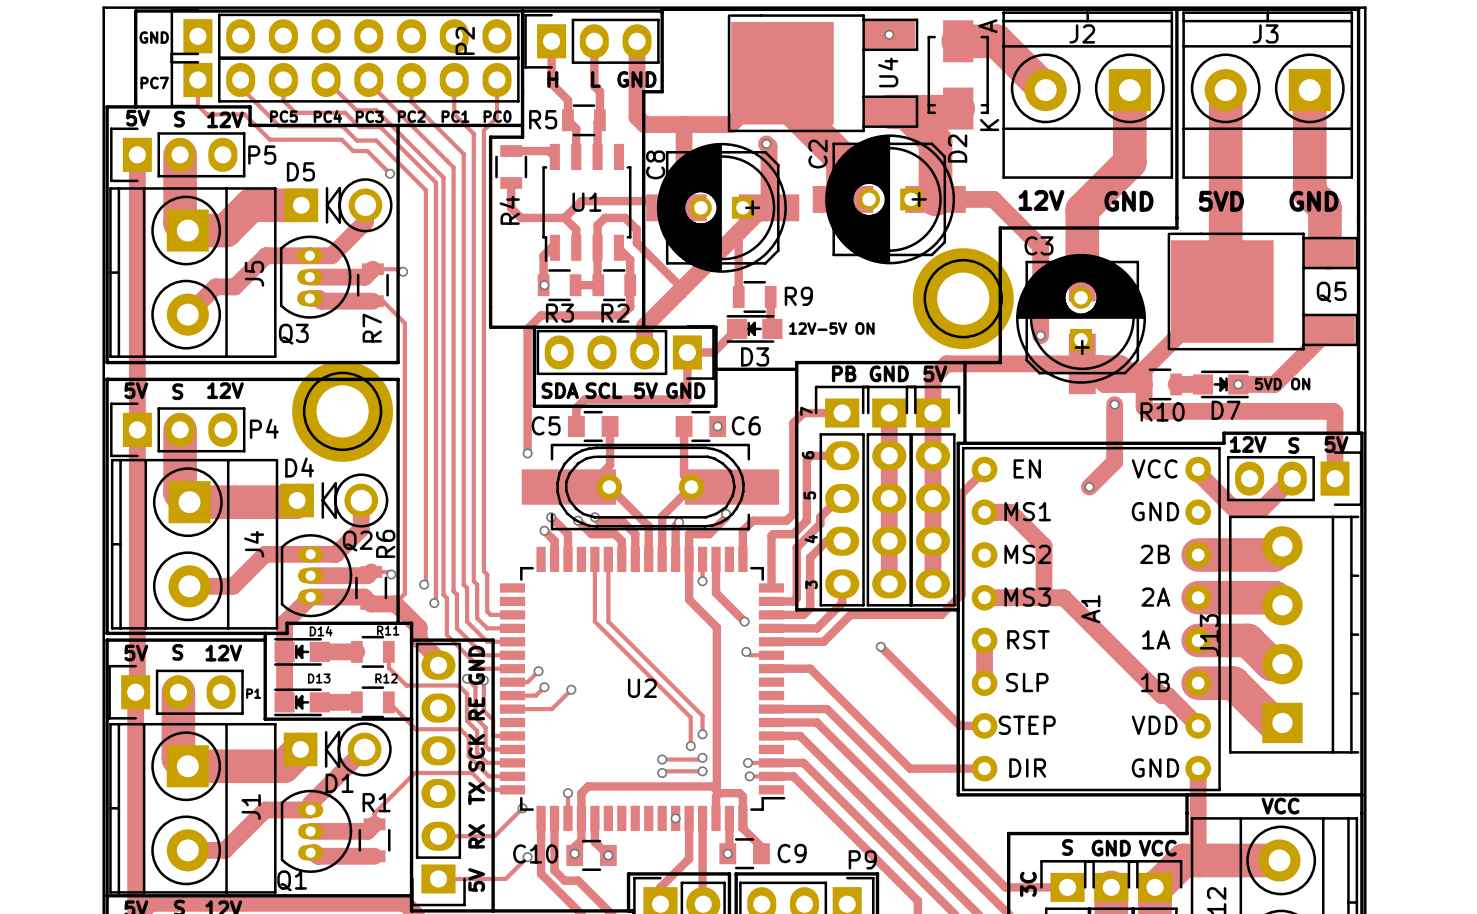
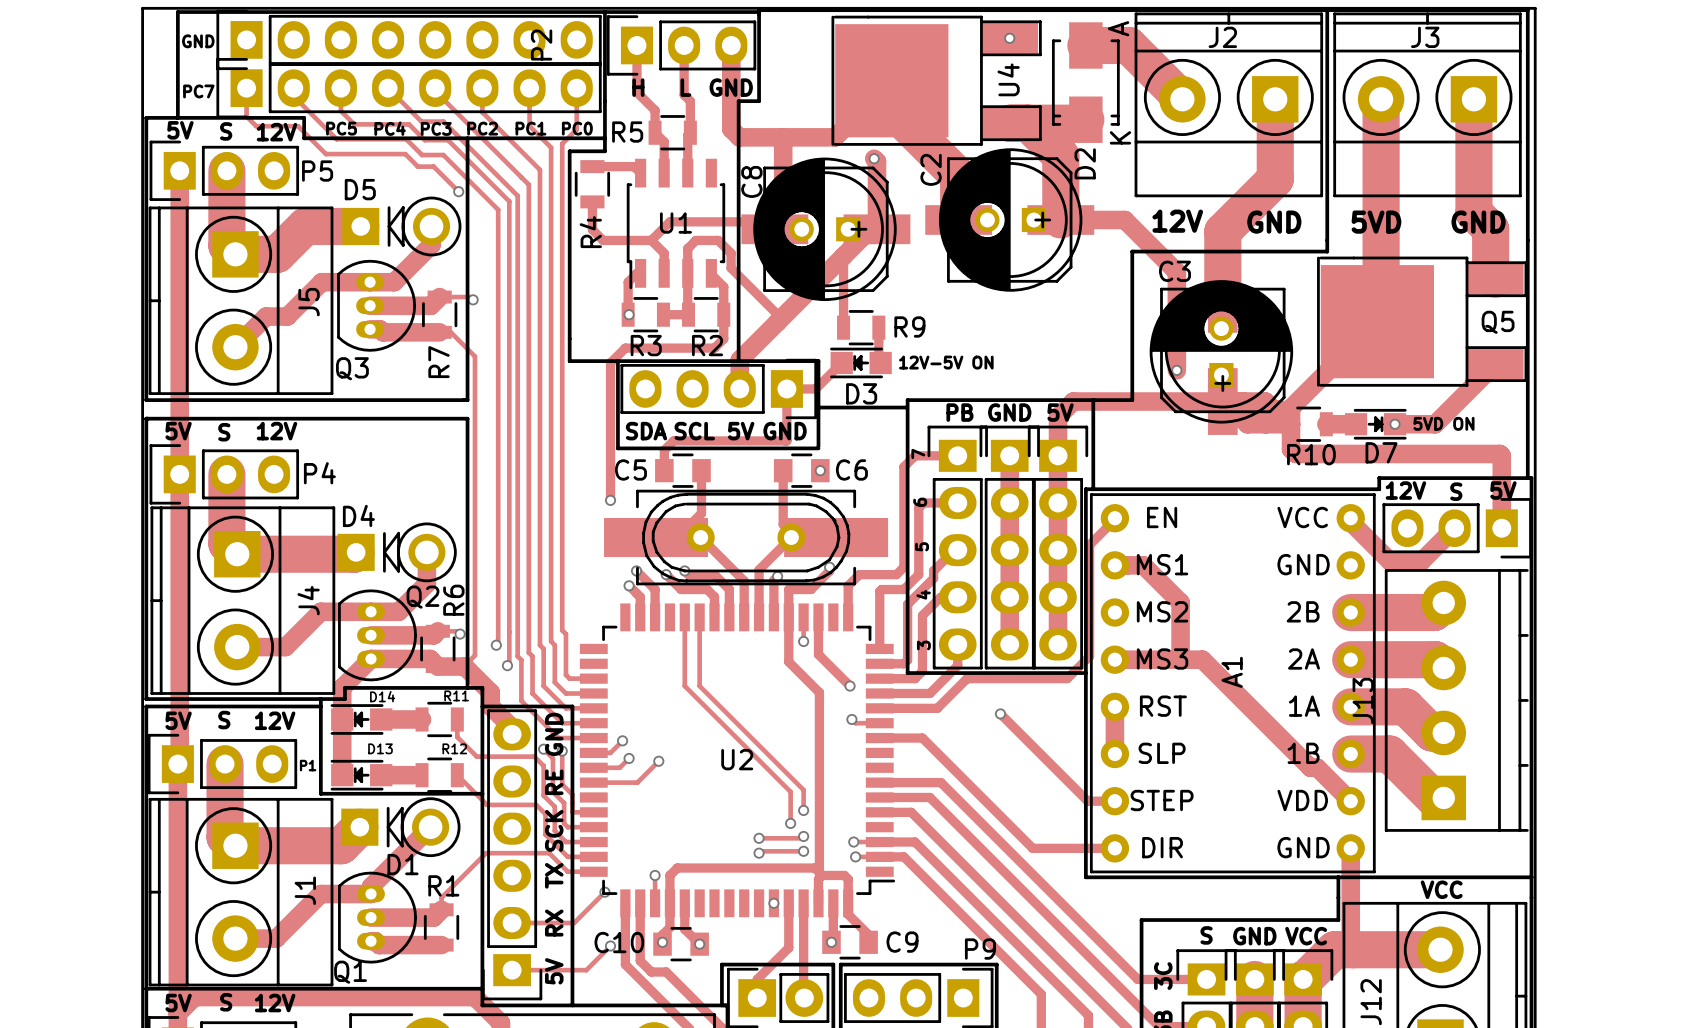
part: (963, 298) -> none
track: (1114, 404) (1114, 461) (1089, 487) -> none
via: (1114, 404) -> none
part: (342, 411) -> none
via: (1089, 487) -> none

